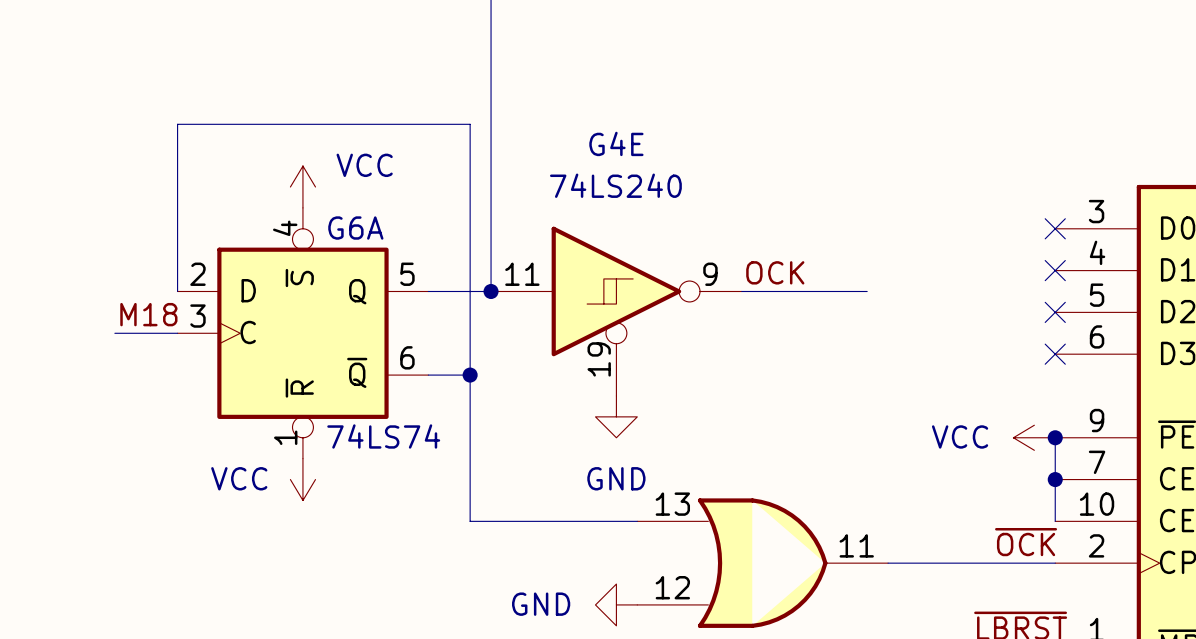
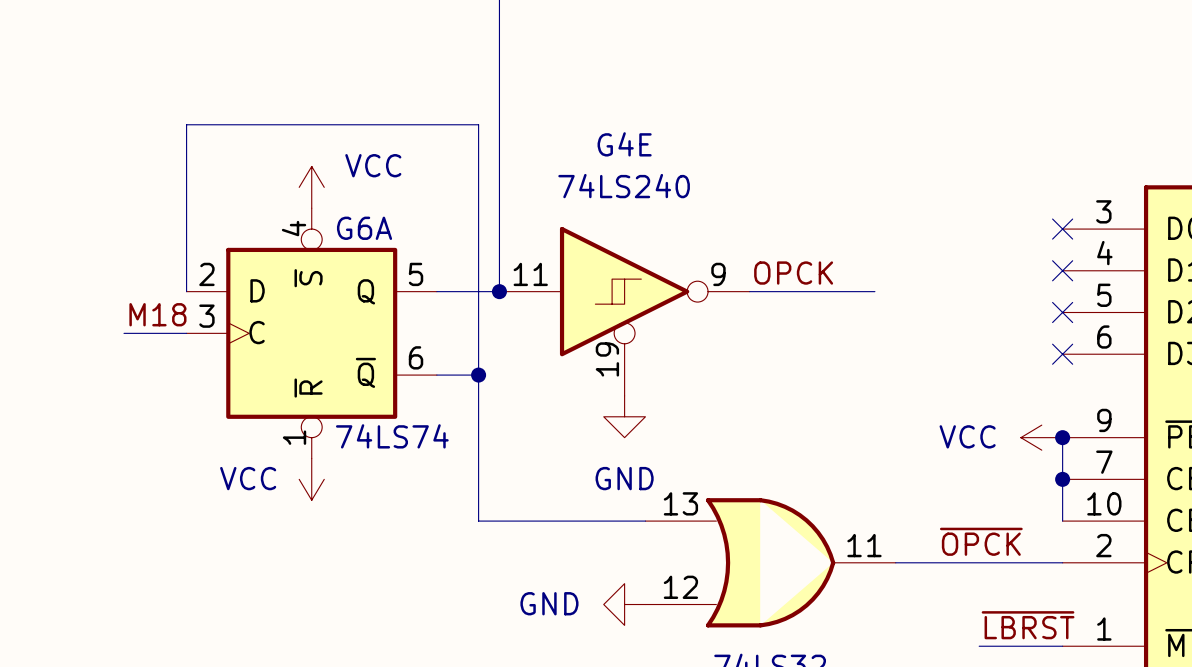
label: OCK (775, 272) -> OPCK (793, 273)
label: ~{OCK} (1026, 542) -> ~{OPCK} (981, 541)

